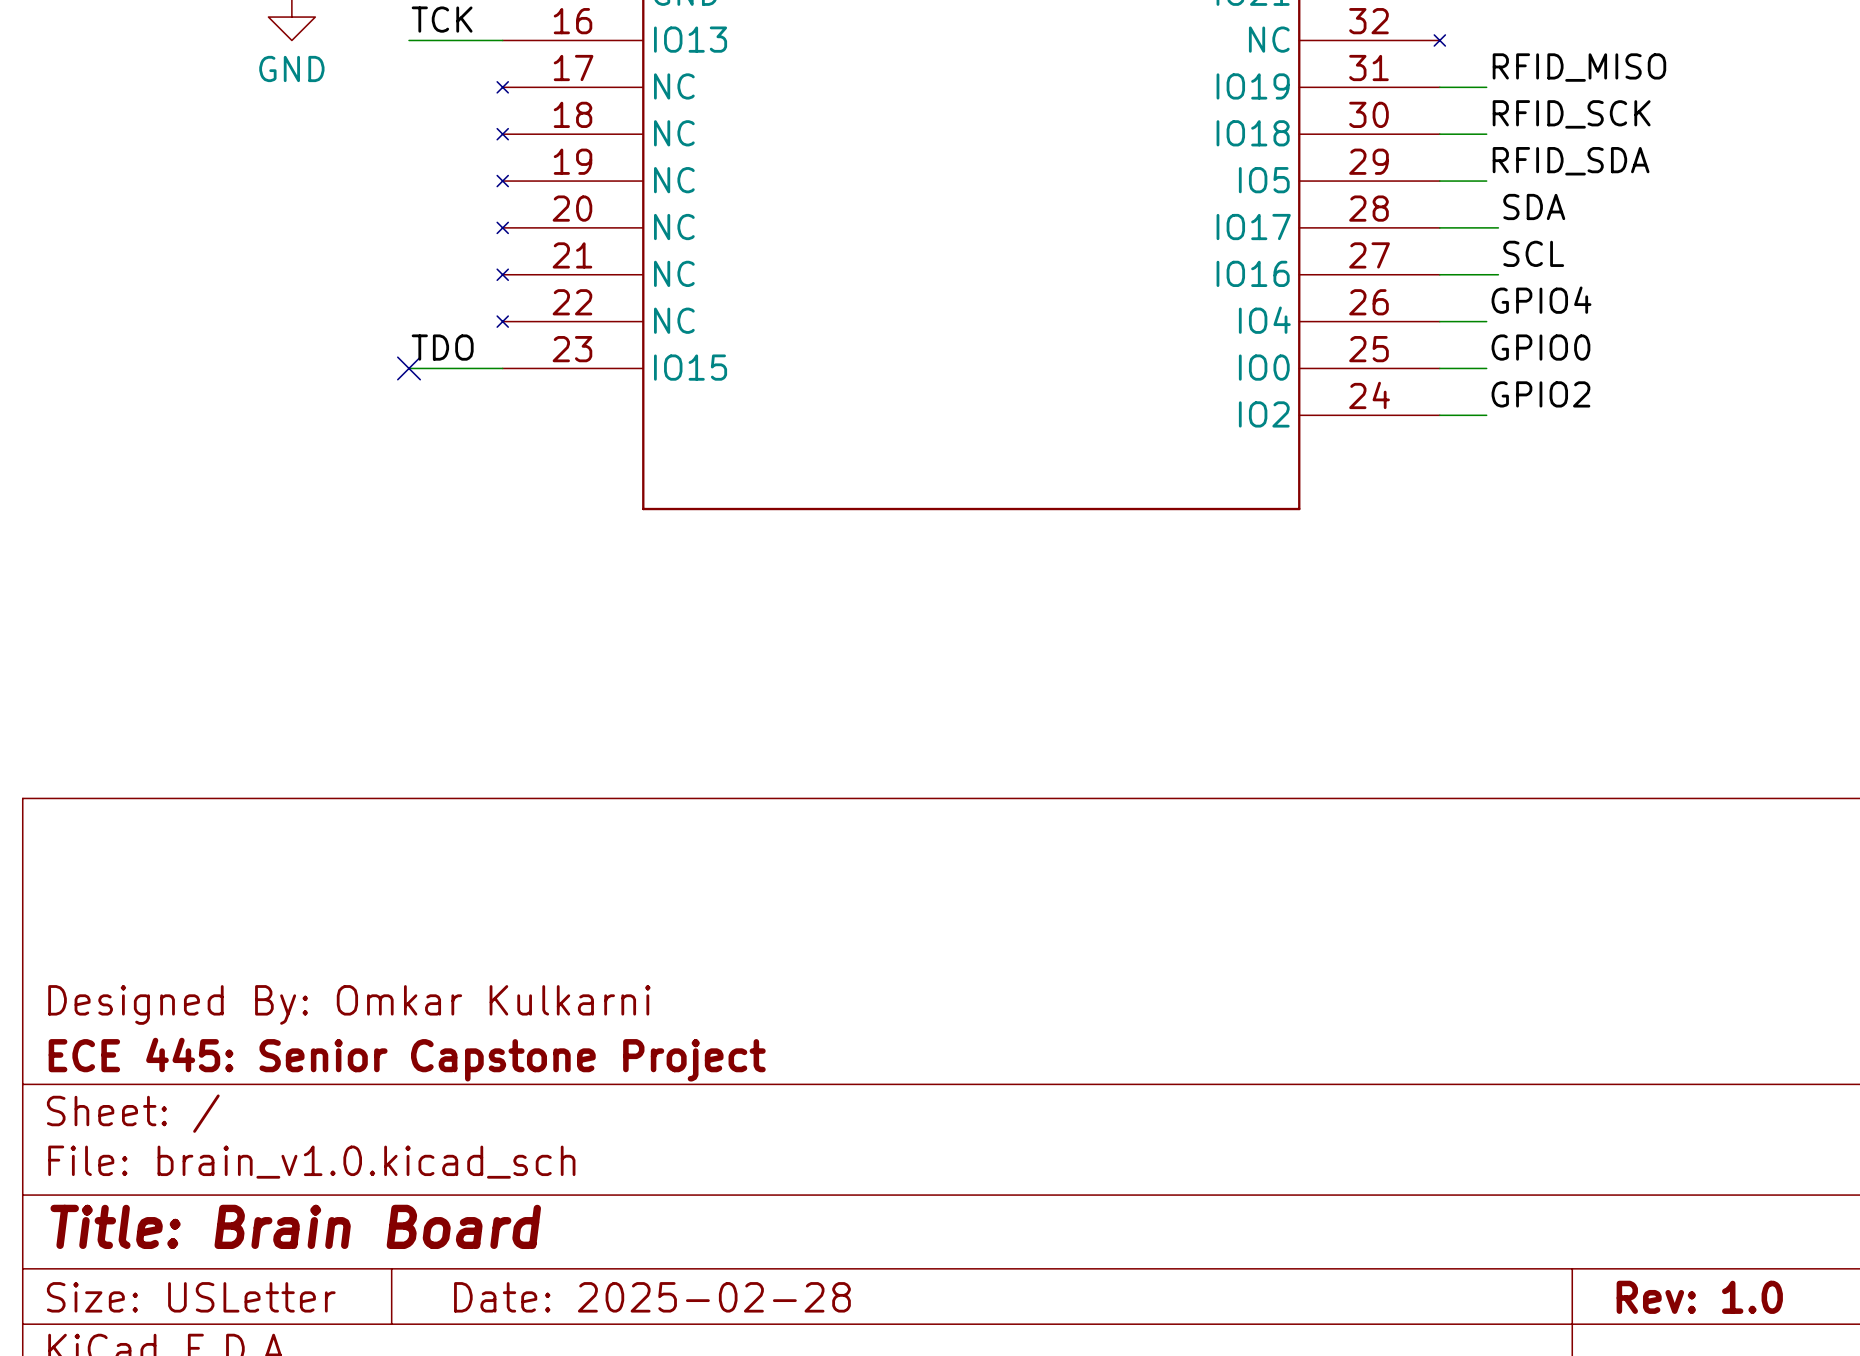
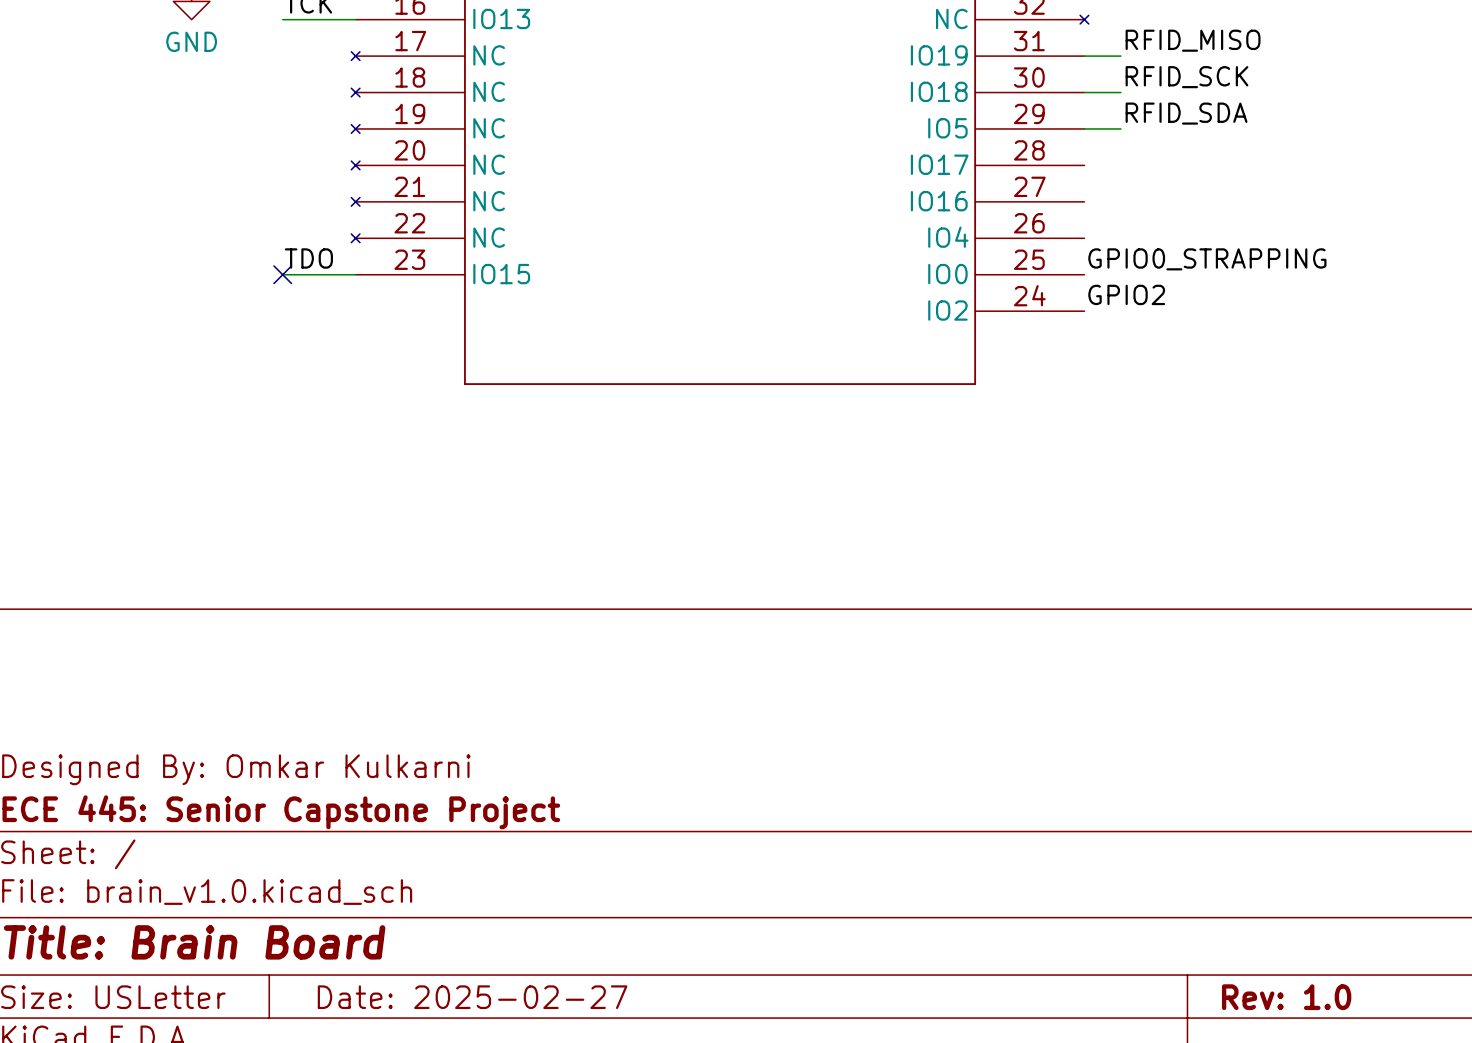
label: SDA (1534, 206) -> none
wire: (1439, 227) (1498, 227) -> none
label: SCL (1533, 253) -> none
wire: (1439, 274) (1498, 274) -> none
label: GPIO4 (1541, 300) -> none
wire: (1439, 321) (1486, 321) -> none
label: GPIO0 (1540, 347) -> none
label: none -> GPIO0_STRAPPING (1207, 259)
wire: (1439, 368) (1486, 368) -> none
label position: GPIO2 (1540, 394) -> GPIO2 (1126, 294)
wire: (1439, 415) (1486, 415) -> none
title block: Date: 2025-02-28 (652, 1297) -> Date: 2025-02-27 (472, 997)

